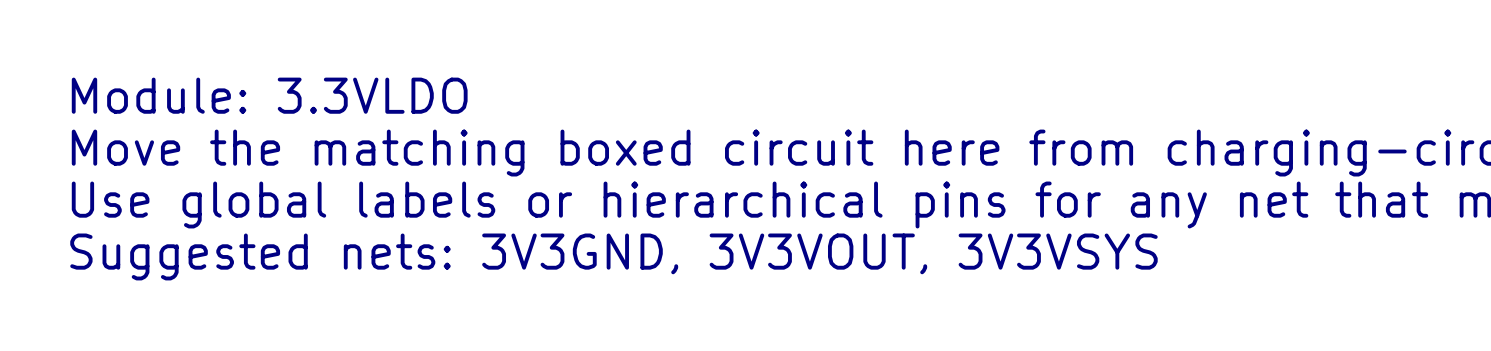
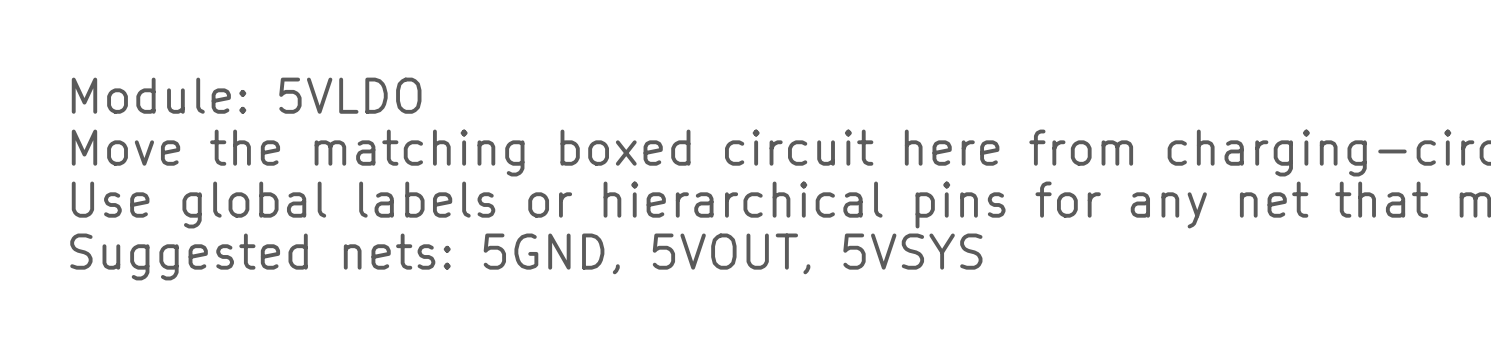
text: Module: 3.3VLDO (269, 95) -> Module: 5VLDO (246, 95)
text: Suggested nets: 3V3GND, 3V3VOUT, 3V3VSYS (613, 256) -> Suggested nets: 5GND, 5VOUT, 5VSYS (526, 256)

